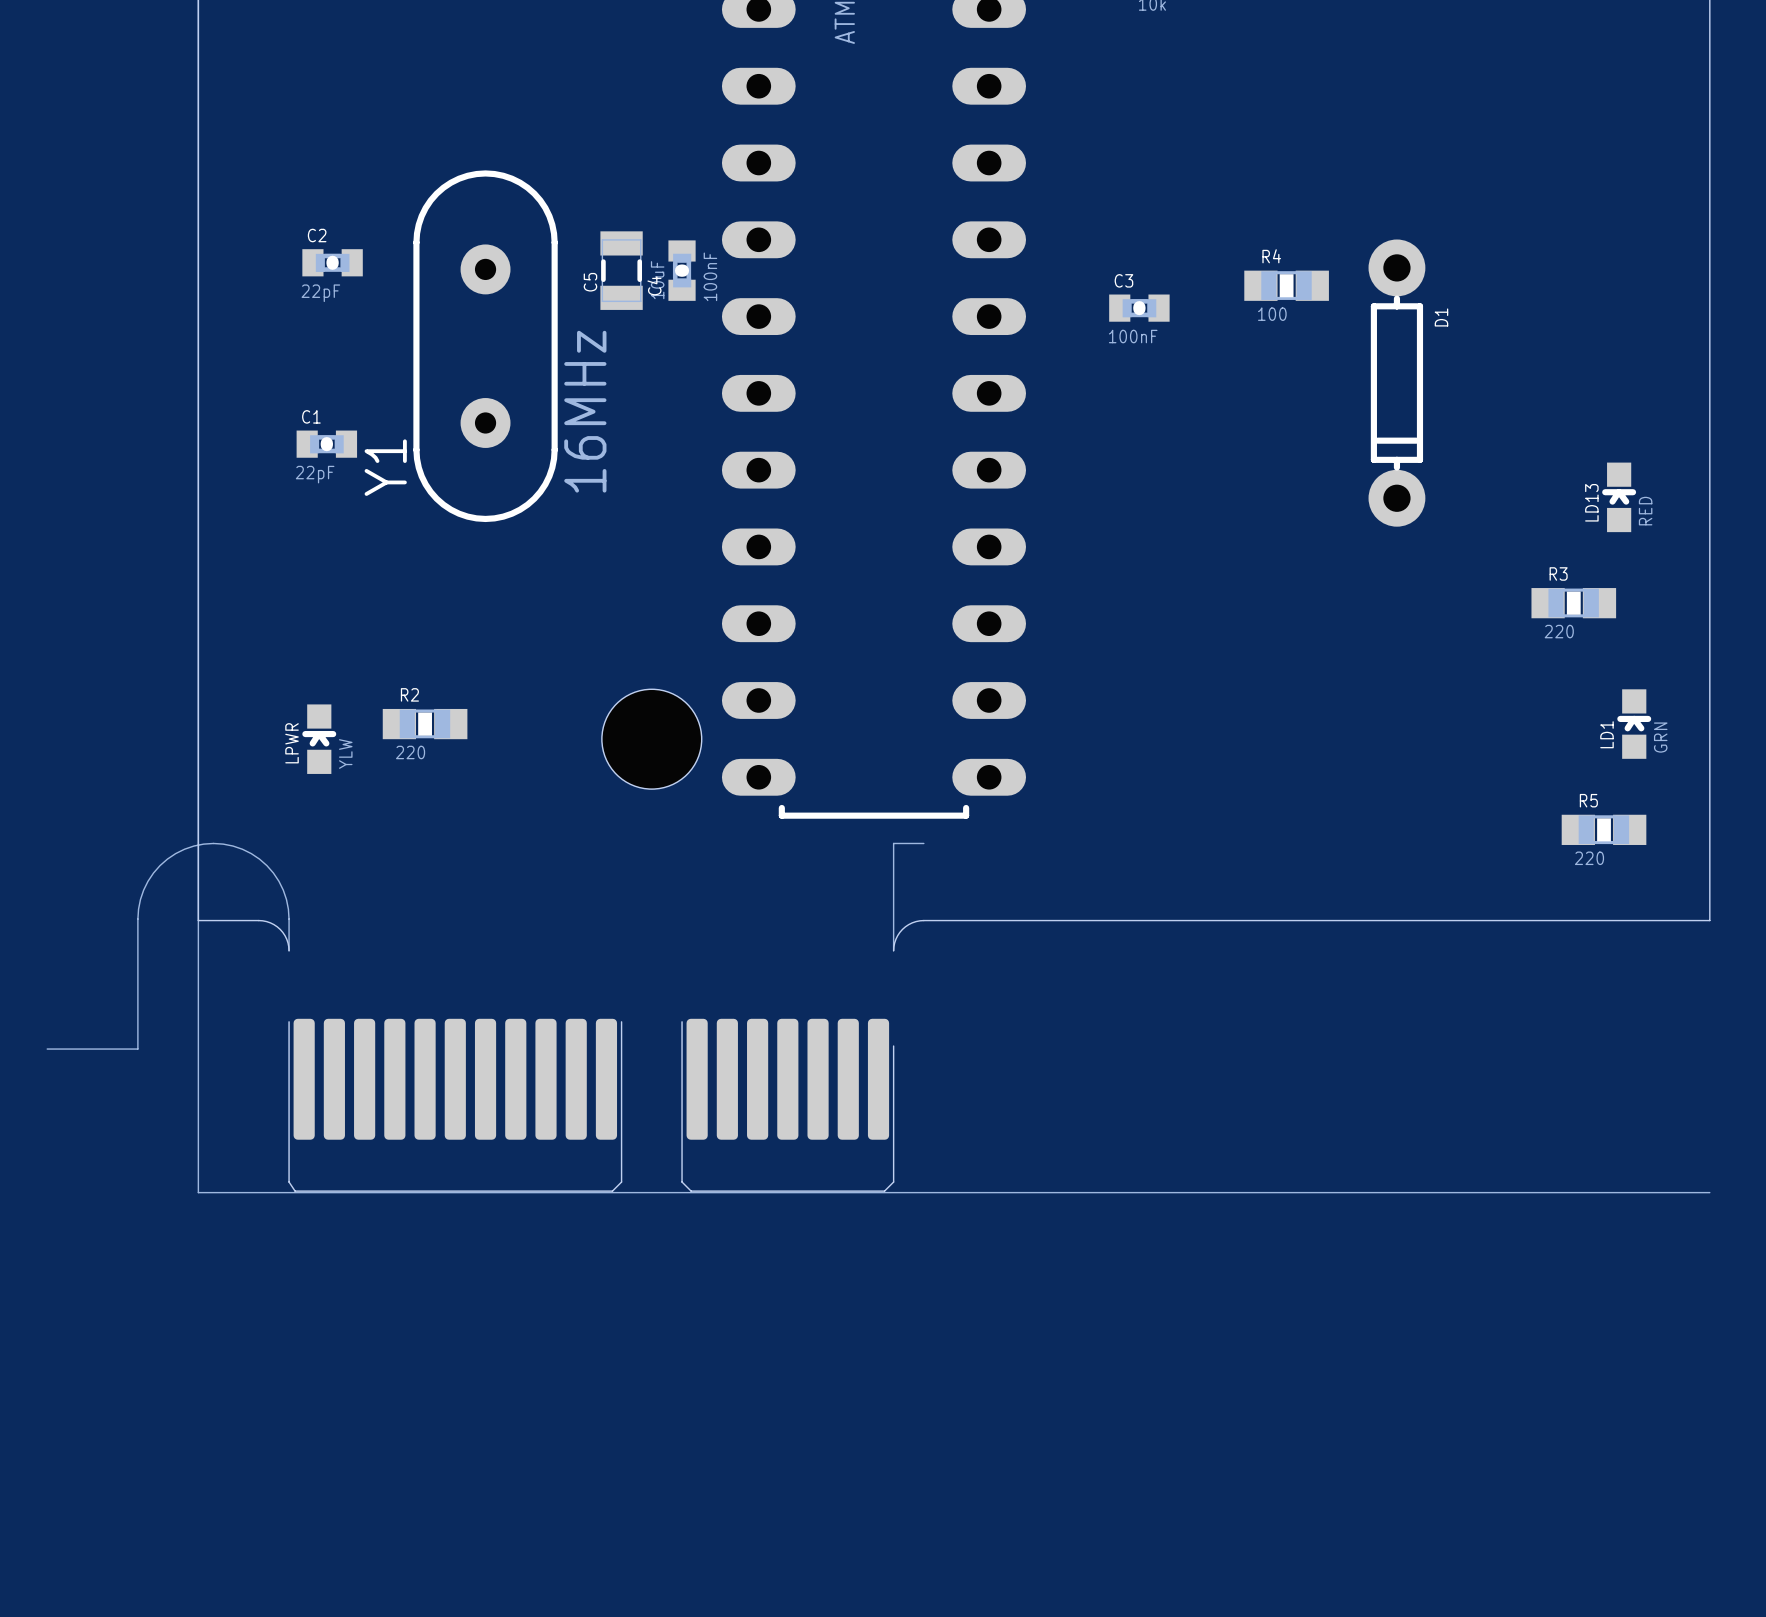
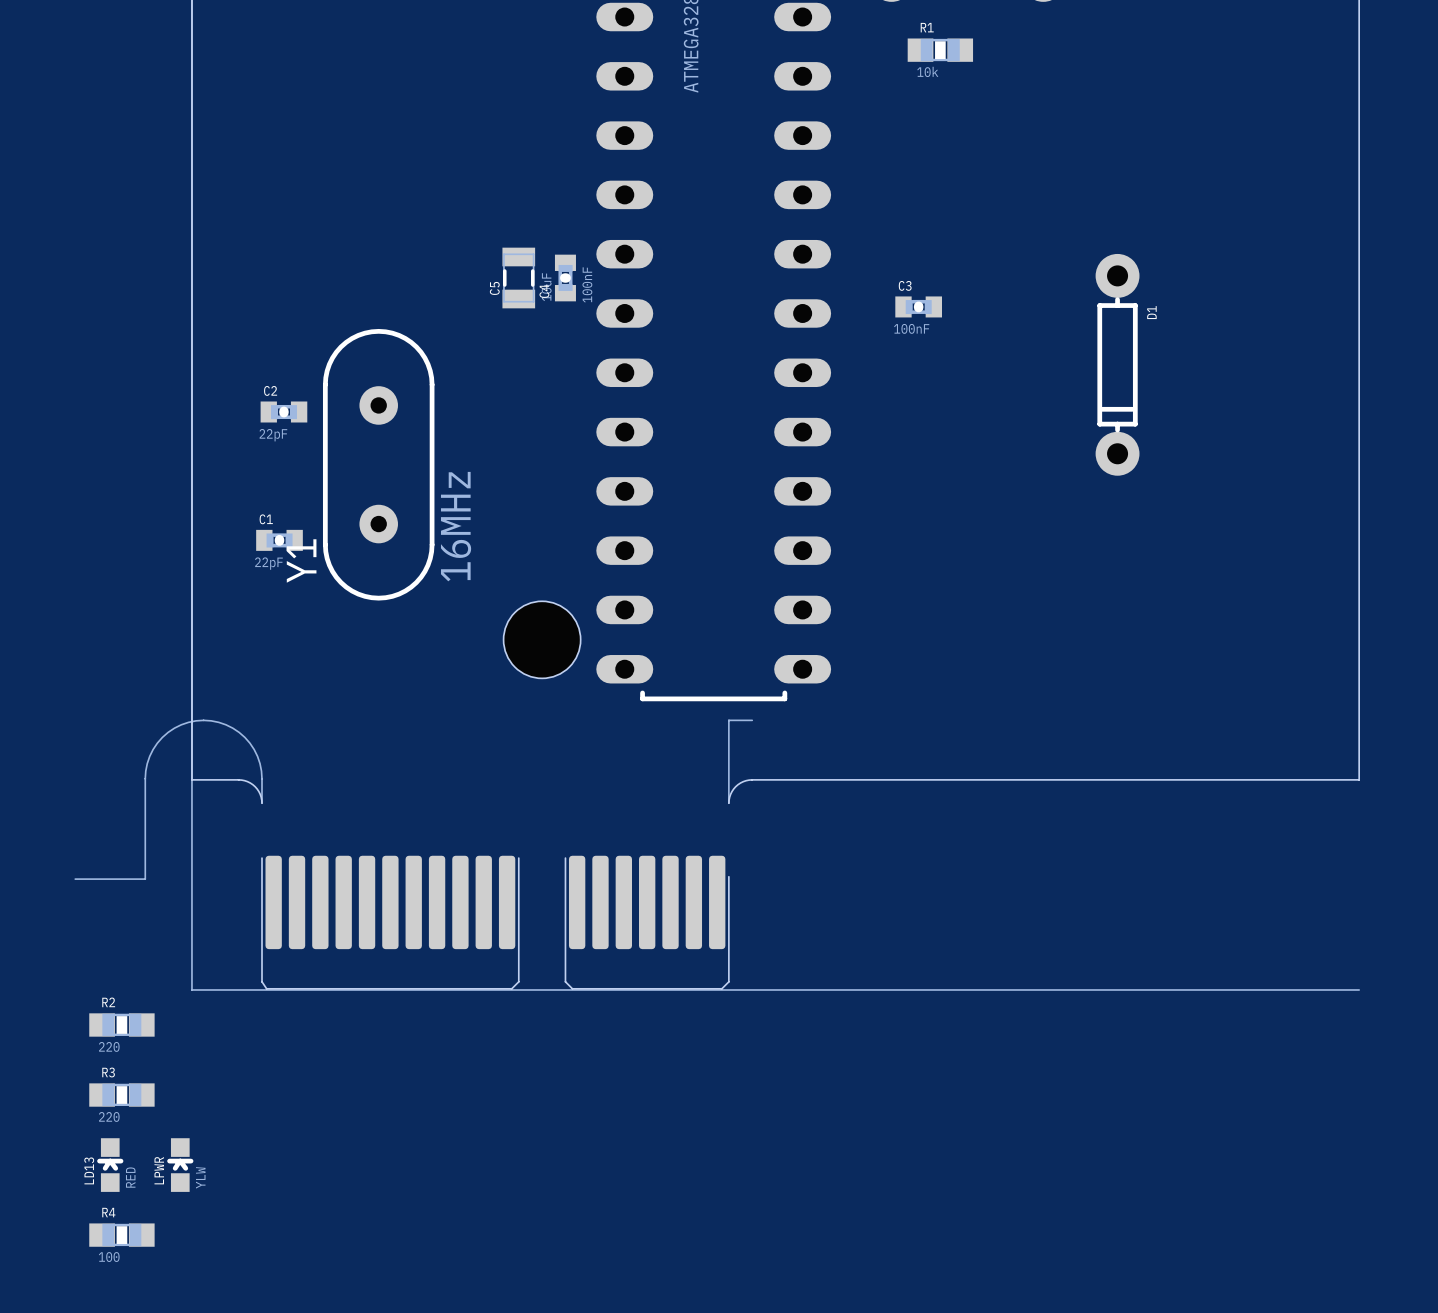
C2 position: (332, 262) -> (283, 411)
R4 position: (1286, 285) -> (121, 1235)
Y1 position: (485, 346) -> (378, 464)
C1 position: (326, 444) -> (279, 540)
LD13 position: (1619, 497) -> (110, 1165)
R3 position: (1573, 603) -> (121, 1095)
R2 position: (425, 724) -> (121, 1025)
LD1: GRN (1634, 724) -> none
LPWR position: (319, 739) -> (180, 1165)
R5: 220 (1604, 829) -> none

